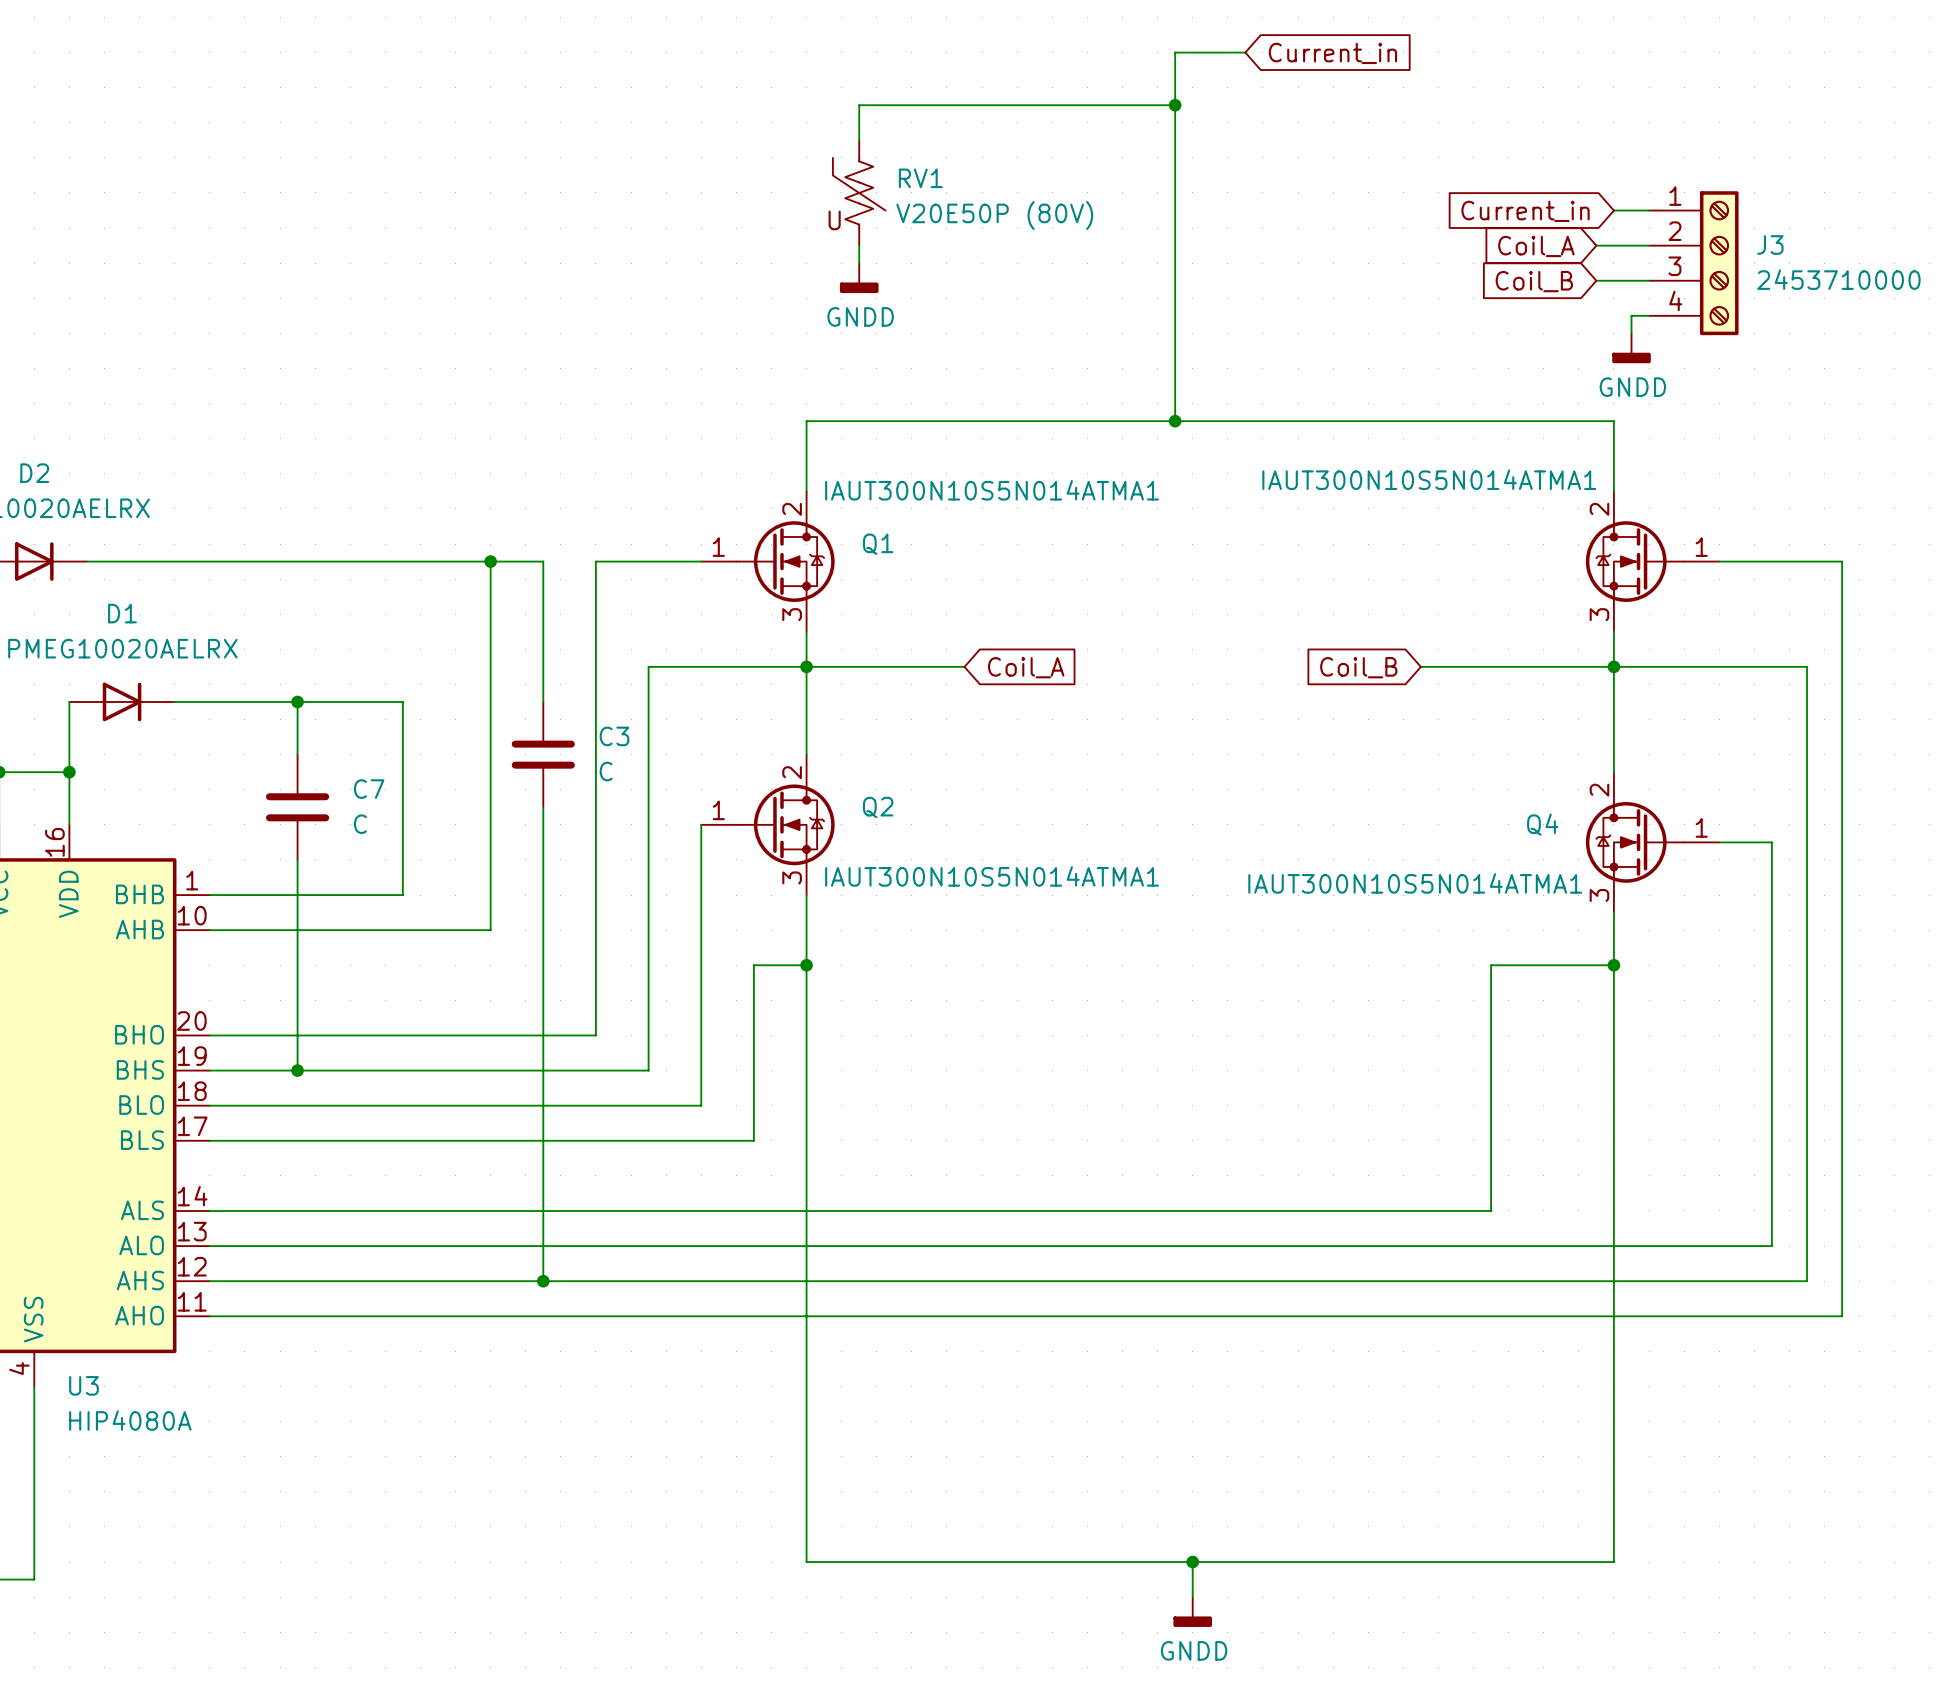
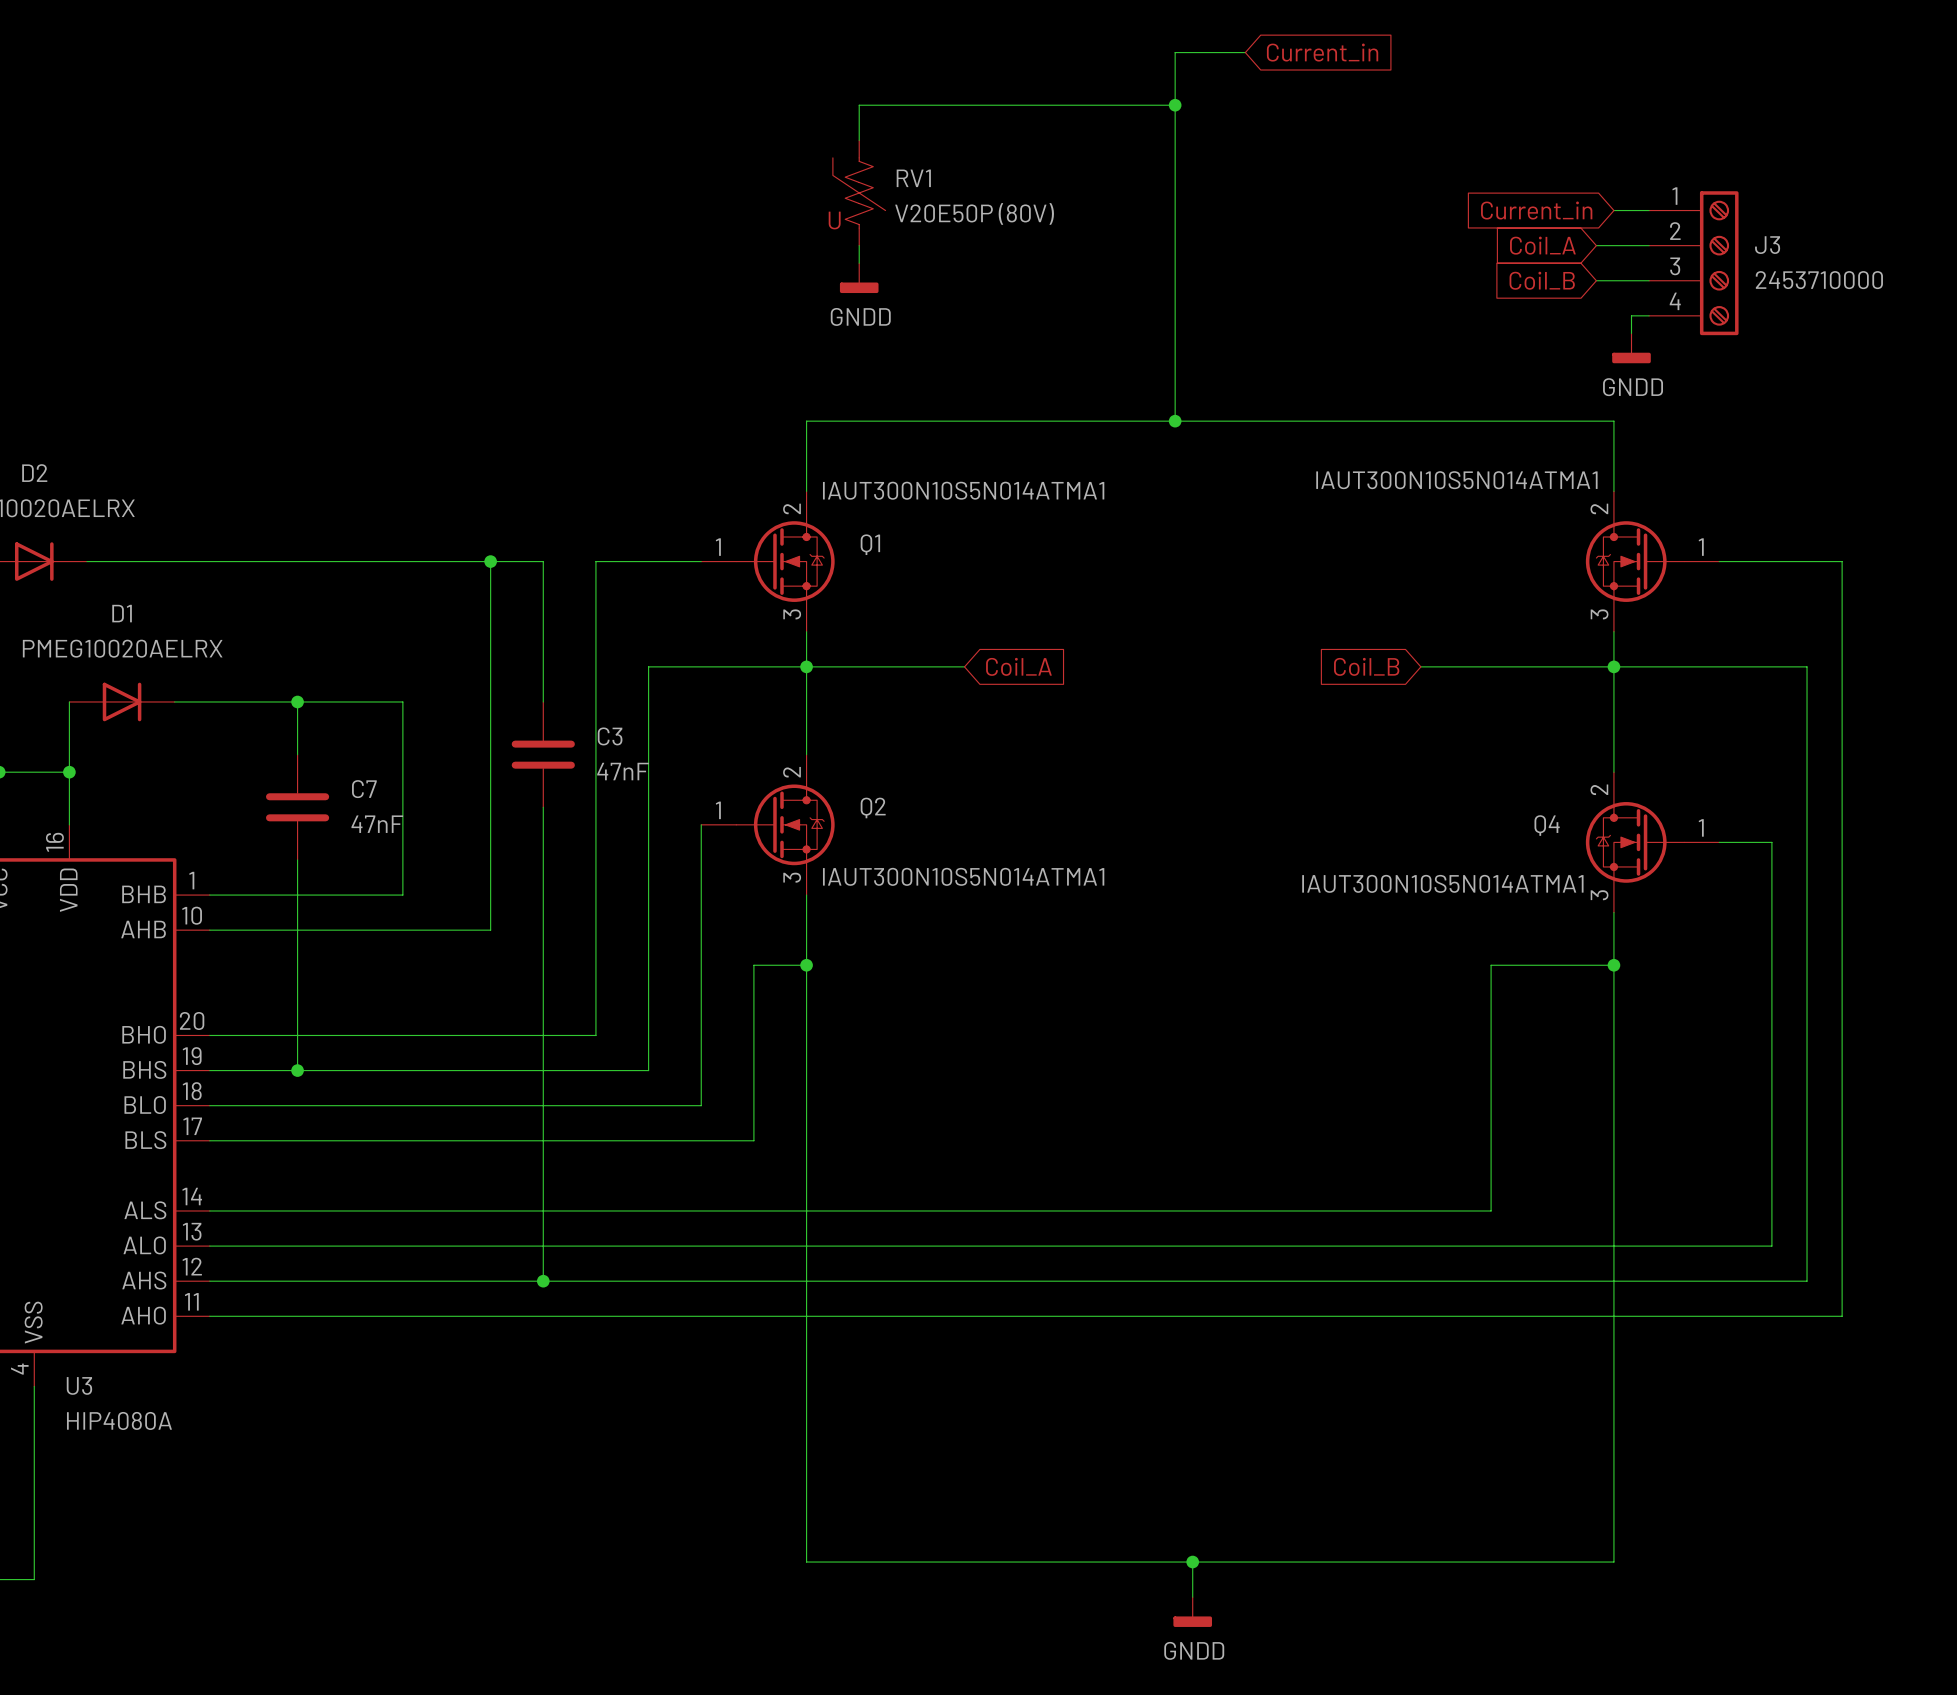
C3 value: C (606, 771) -> 47nF (623, 771)
C7 value: C (360, 824) -> 47nF (377, 824)

